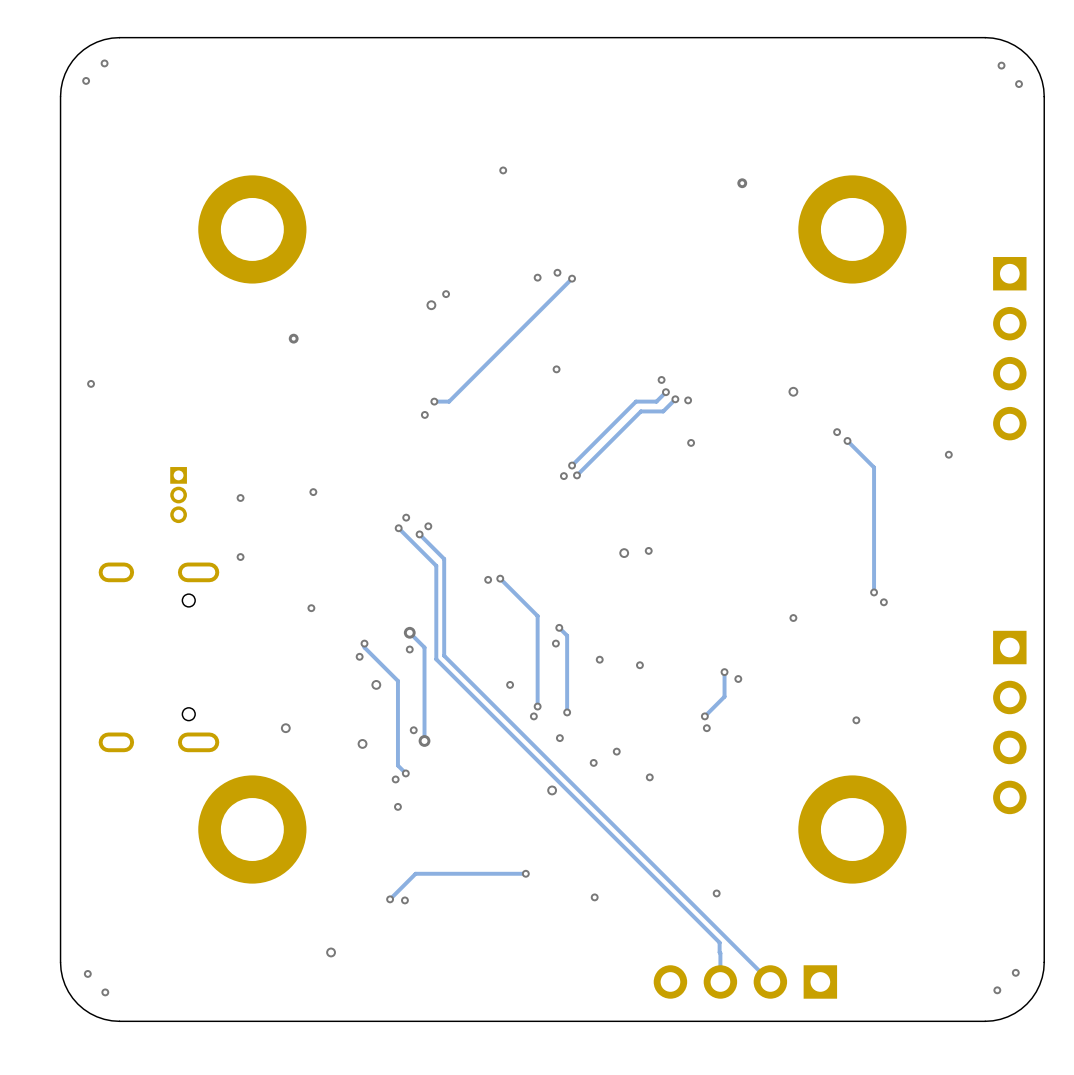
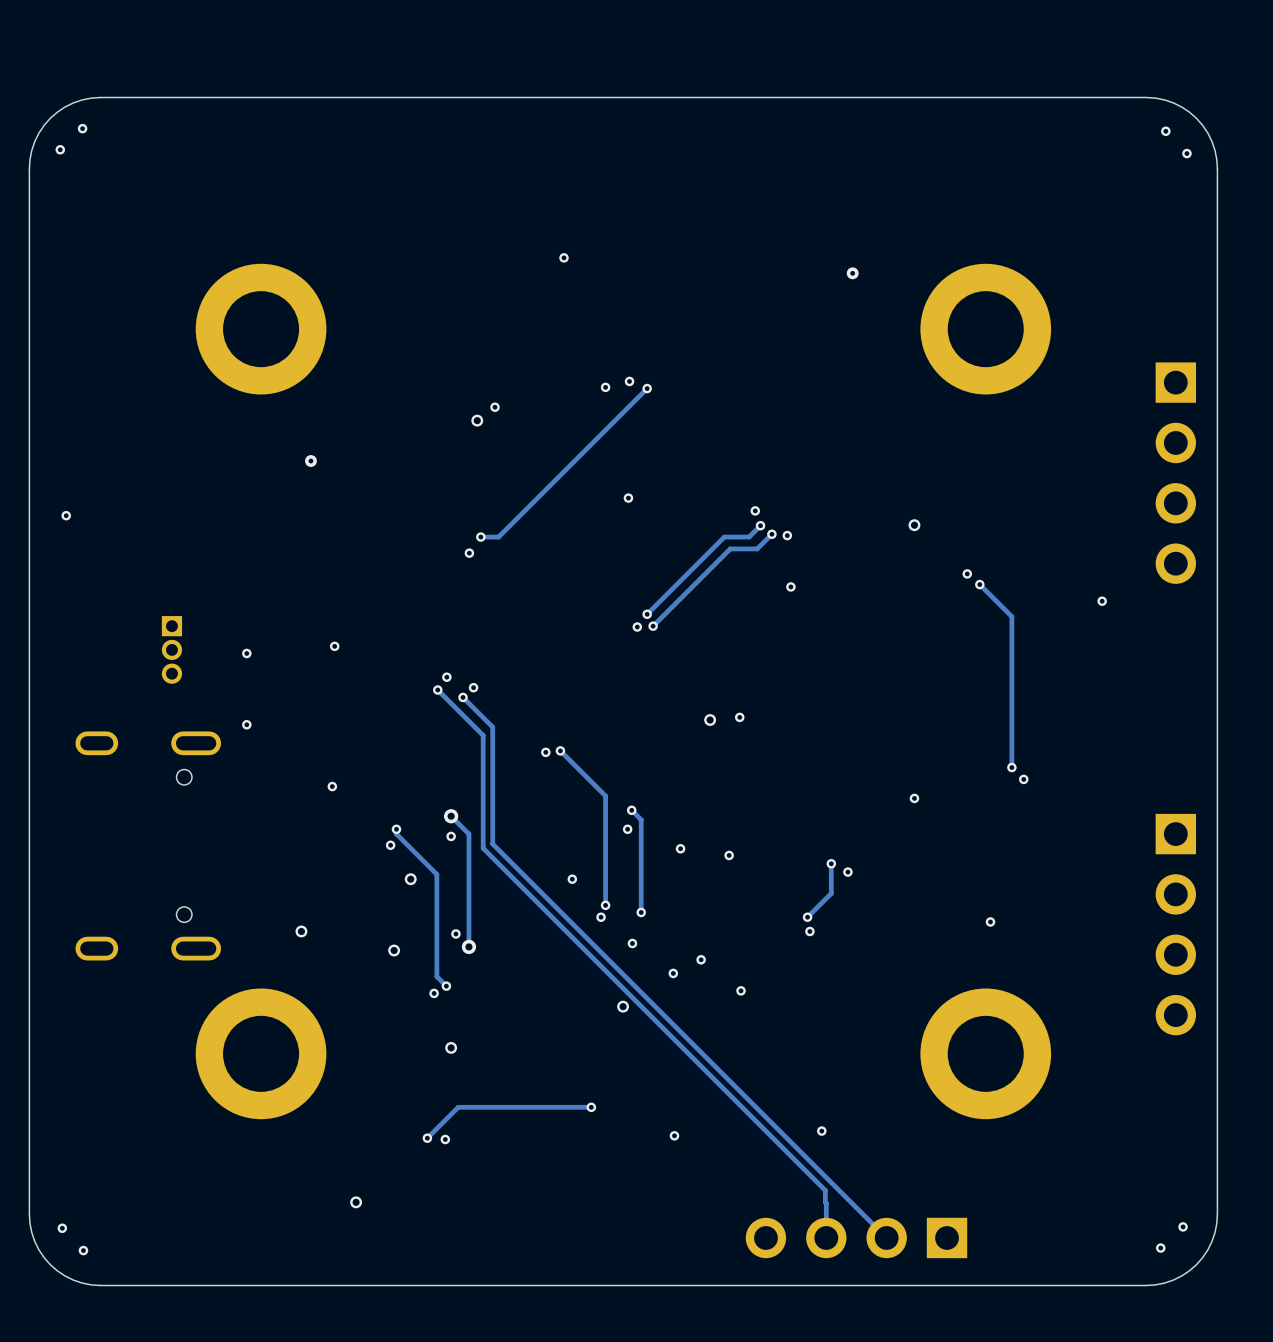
via: (397, 806) -> none
via: none -> (451, 1047)

